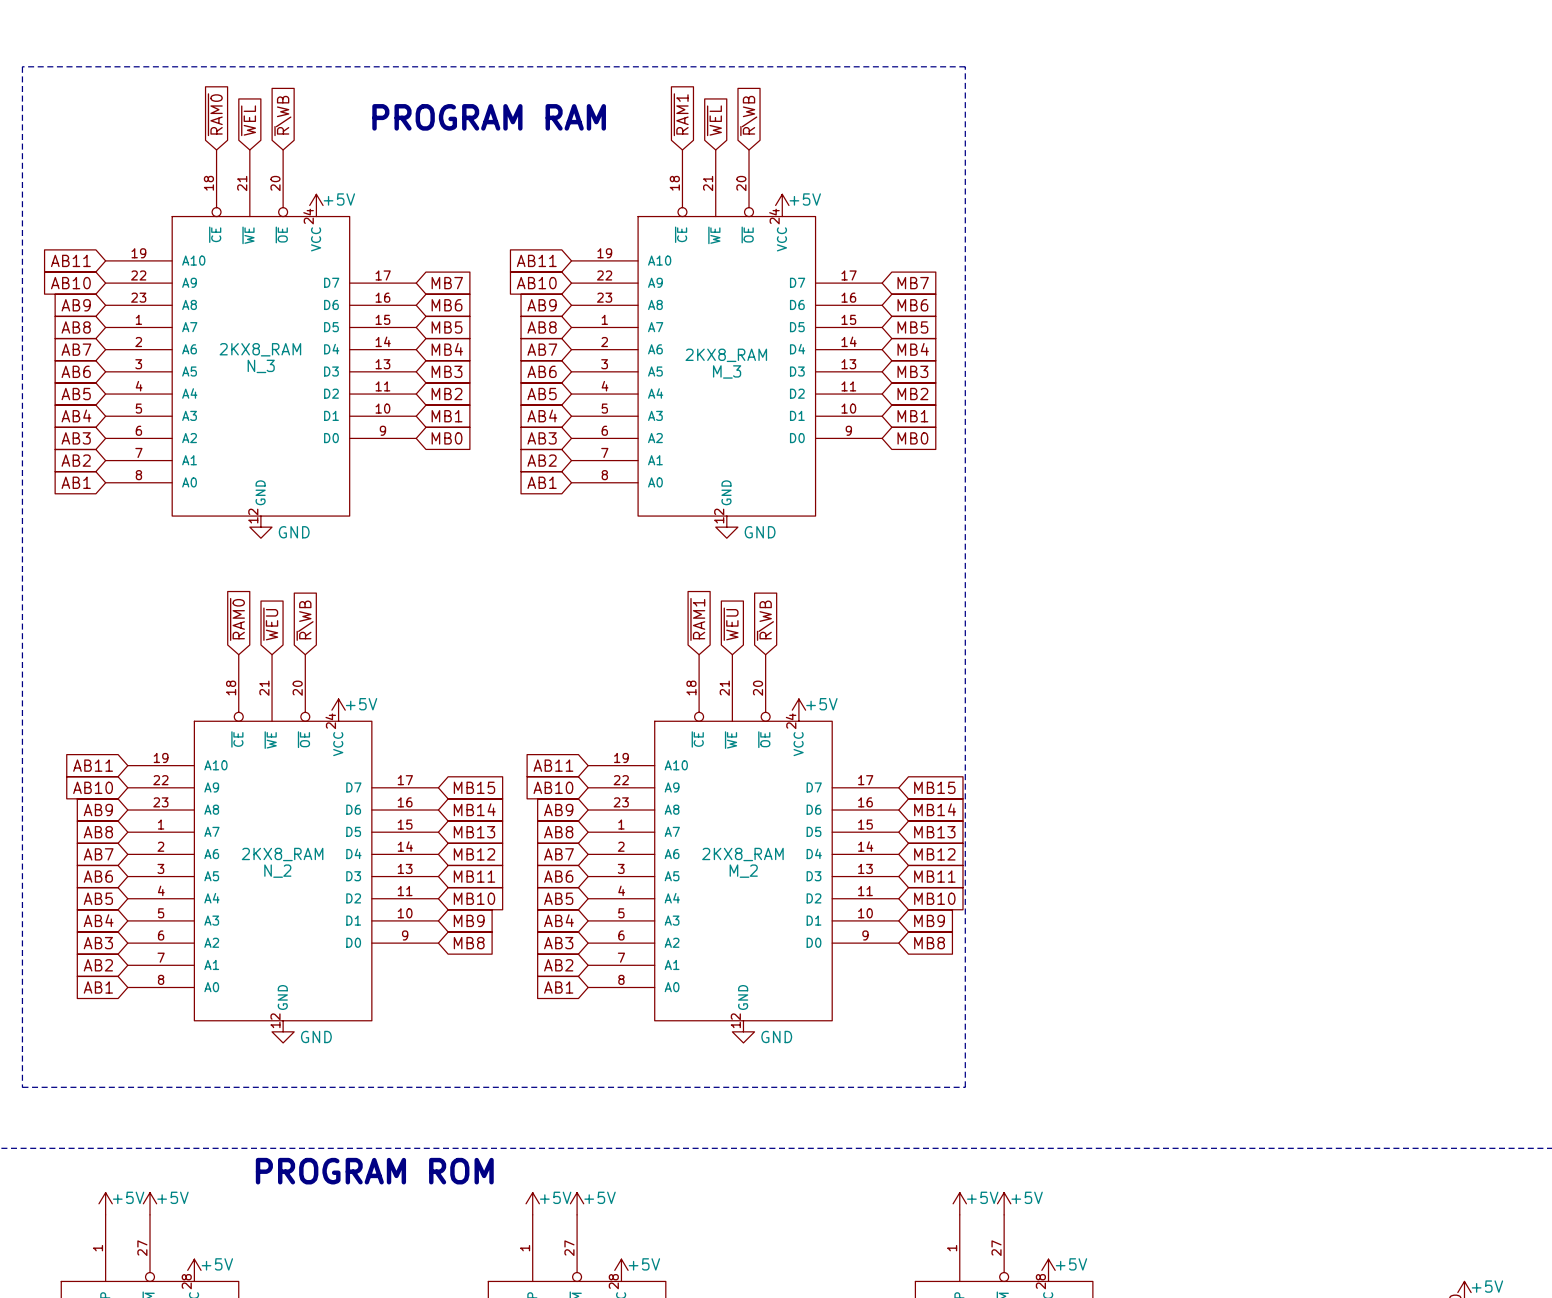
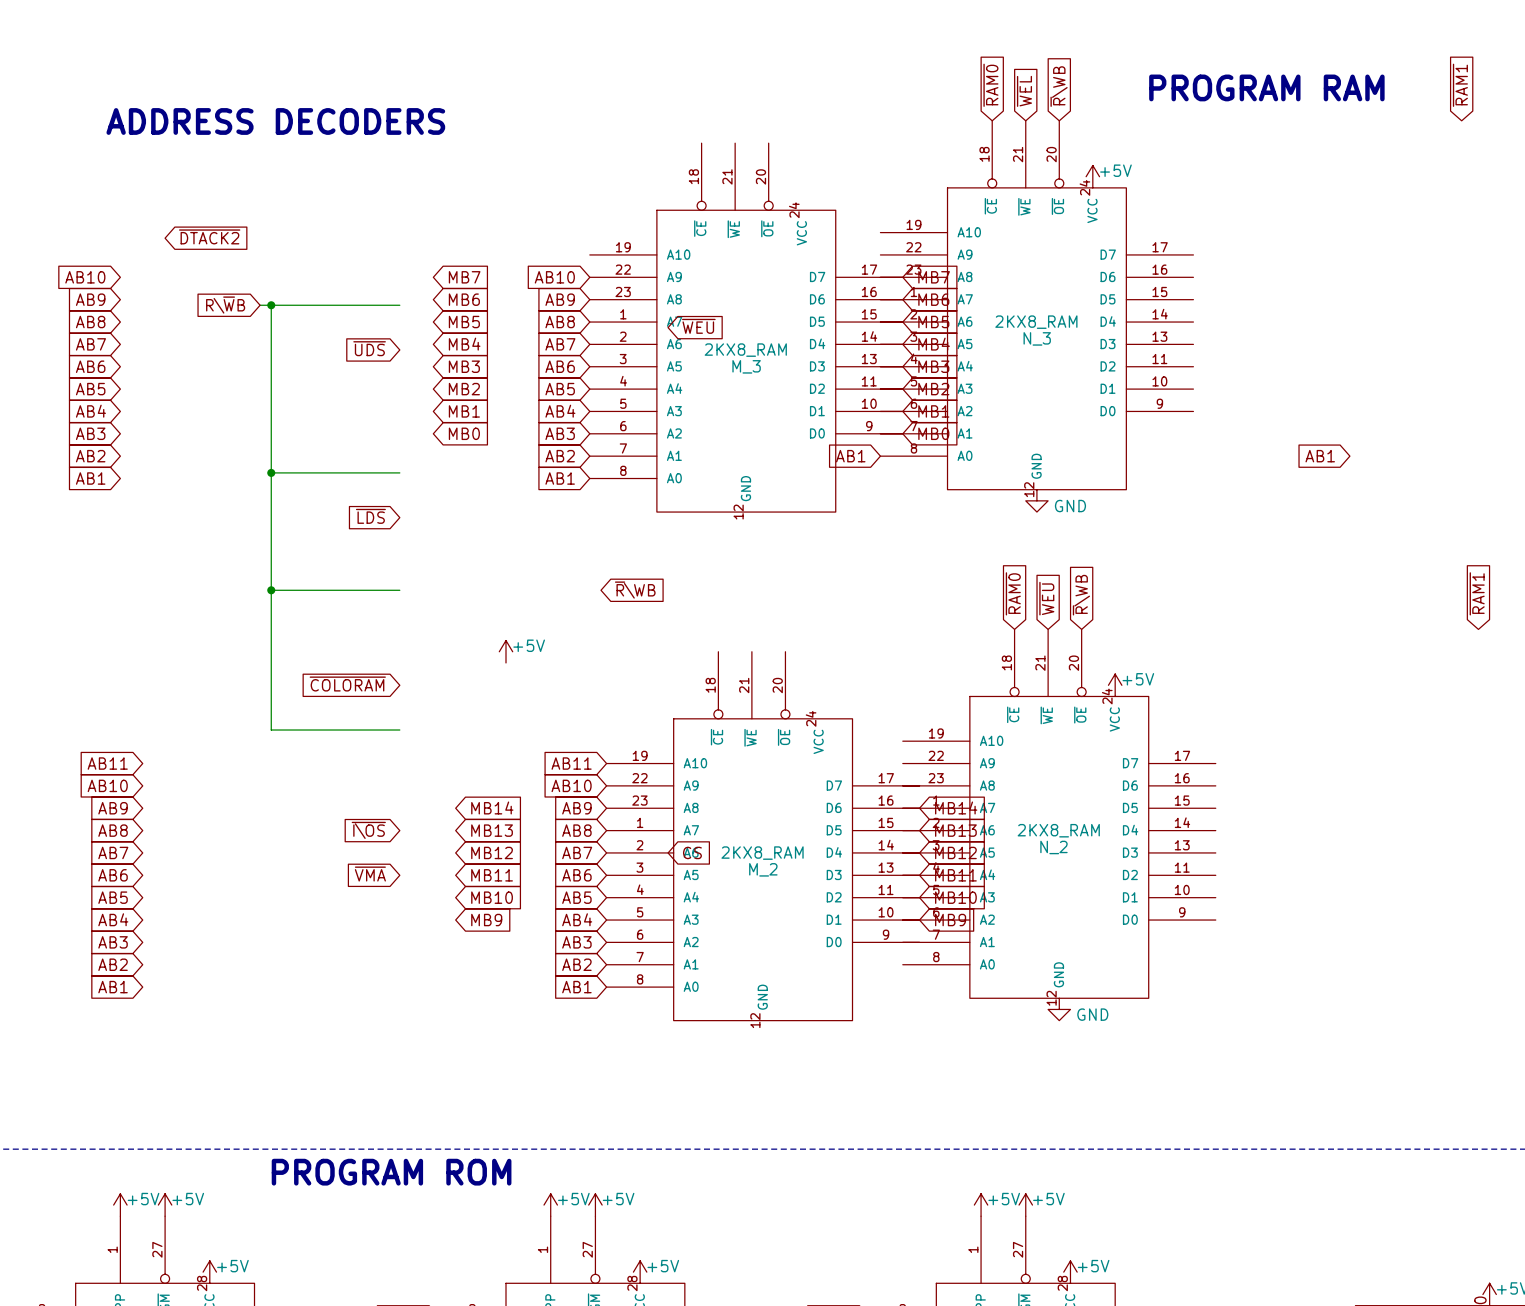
line: (22, 66) (965, 66) (965, 1087) (22, 1087) (22, 66) -> none
global label: none -> ~{RAM0} (990, 85)
global label: none -> ~{RAM1} (1460, 85)
global label: none -> ~{R}\WB (1059, 86)
text: none -> PROGRAM RAM (1266, 87)
global label: none -> ~{WEL} (1024, 91)
global label: ~{RAM0} (215, 114) -> none
global label: ~{RAM1} (681, 114) -> none
global label: ~{R}\WB (282, 116) -> none
global label: ~{R}\WB (748, 116) -> none
text: PROGRAM RAM (489, 117) -> none
global label: ~{WEL} (248, 120) -> none
global label: ~{WEL} (714, 120) -> none
text: none -> ADDRESS DECODERS (275, 121)
power symbol: none -> +5V (1092, 176)
power symbol: +5V (316, 205) -> none
power symbol: +5V (782, 205) -> none
global label: none -> ~{DTACK2} (209, 236)
global label: AB11 (70, 260) -> none
global label: AB11 (536, 260) -> none
global label: none -> R\~{W}B (225, 305)
wire: none -> (260, 305) (399, 305)
wire: none -> (271, 305) (271, 730) (399, 730)
junction: none -> (271, 305)
global label: none -> ~{WEU} (698, 326)
N_3 position: (260, 333) -> (1036, 305)
global label: none -> ~{UDS} (369, 348)
global label: none -> AB1 (850, 456)
global label: none -> AB1 (1320, 456)
wire: none -> (271, 472) (399, 472)
junction: none -> (271, 472)
power symbol: none -> GND (1036, 500)
global label: none -> ~{LDS} (370, 516)
power symbol: GND (260, 527) -> none
power symbol: GND (726, 527) -> none
wire: none -> (271, 590) (399, 590)
junction: none -> (271, 590)
global label: none -> ~{R}\WB (635, 590)
global label: none -> ~{RAM0} (1013, 593)
global label: none -> ~{RAM1} (1477, 593)
global label: none -> ~{R}\WB (1081, 595)
global label: none -> ~{WEU} (1046, 598)
global label: ~{RAM0} (237, 619) -> none
global label: ~{RAM1} (697, 619) -> none
global label: ~{R}\WB (305, 620) -> none
global label: ~{R}\WB (765, 620) -> none
global label: ~{WEU} (270, 624) -> none
global label: ~{WEU} (731, 624) -> none
power symbol: none -> +5V (506, 651)
global label: none -> ~{COLORAM} (347, 684)
power symbol: none -> +5V (1115, 685)
power symbol: +5V (338, 710) -> none
power symbol: +5V (798, 710) -> none
global label: MB15 (474, 787) -> none
global label: MB15 (934, 787) -> none
global label: none -> ~{I\OS} (368, 830)
N_2 position: (283, 837) -> (1059, 813)
global label: none -> CS (692, 852)
global label: none -> ~{VMA} (370, 874)
global label: MB8 (469, 943) -> none
global label: MB8 (929, 943) -> none
power symbol: none -> GND (1059, 1009)
power symbol: GND (283, 1031) -> none
power symbol: GND (743, 1031) -> none

